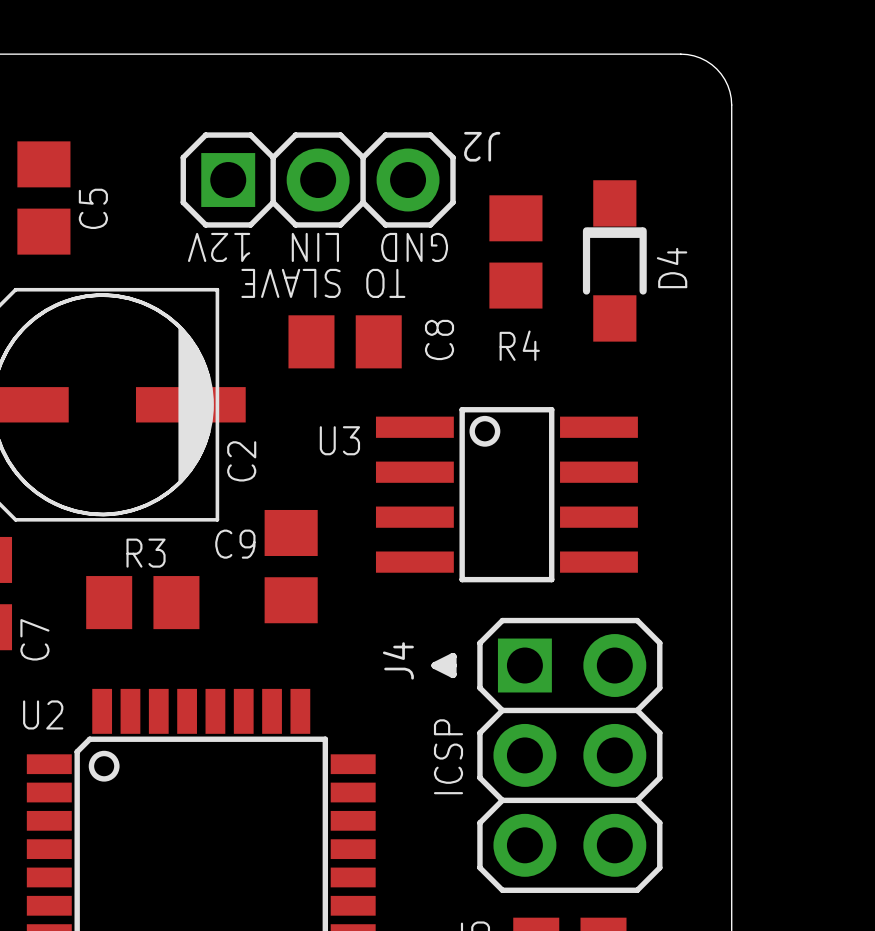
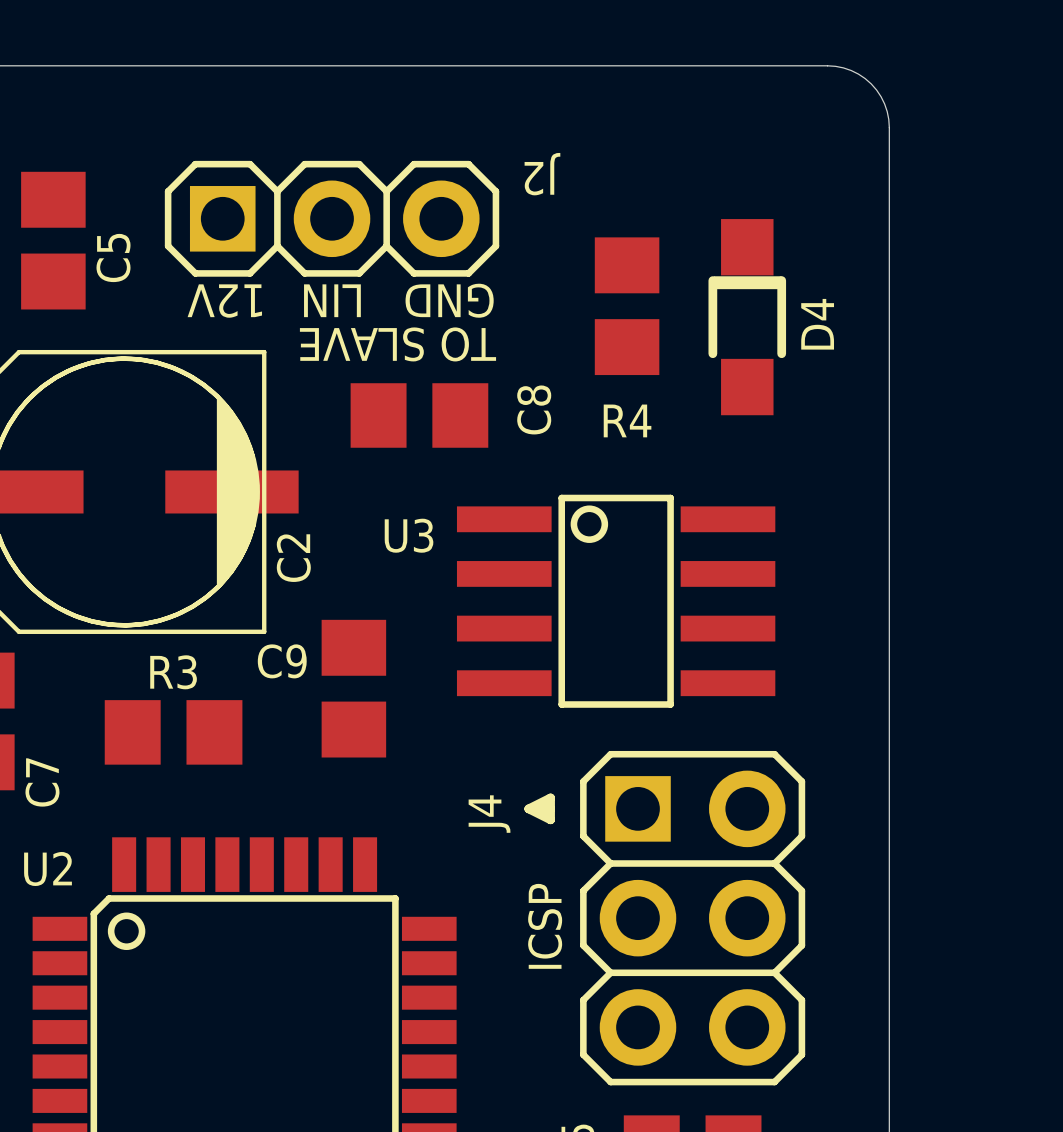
J2 position: (318, 180) -> (332, 218)
text position: 12V (219, 247) -> 12V (224, 301)
text position: LIN (315, 247) -> LIN (332, 300)
text position: GND (414, 247) -> GND (449, 300)

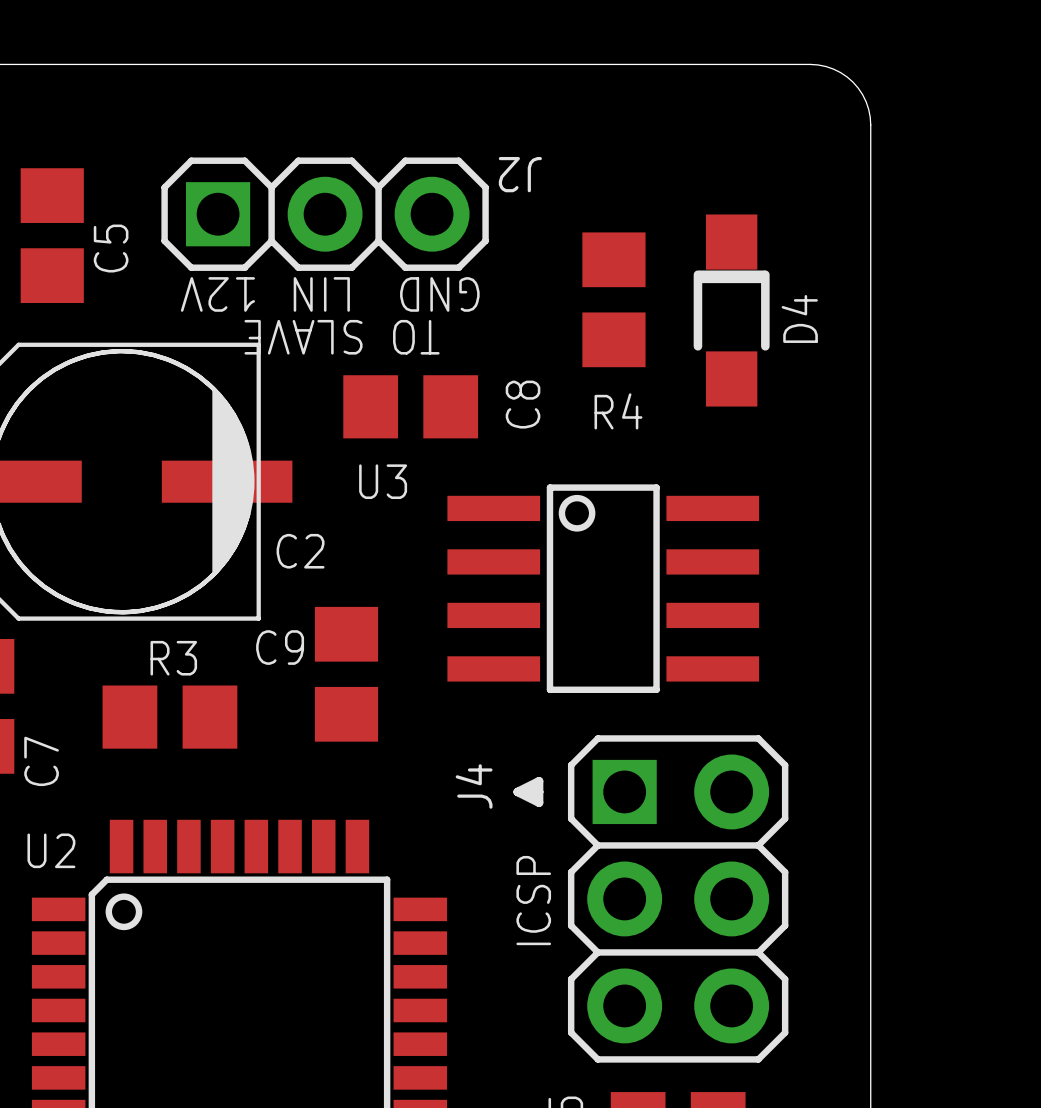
text position: TO SLAVE (397, 344) -> TO SLAVE (342, 337)
U3 name position: U3 (409, 535) -> U3 (383, 481)
C2 name rotation: 0° (293, 558) -> 90° clockwise (300, 551)

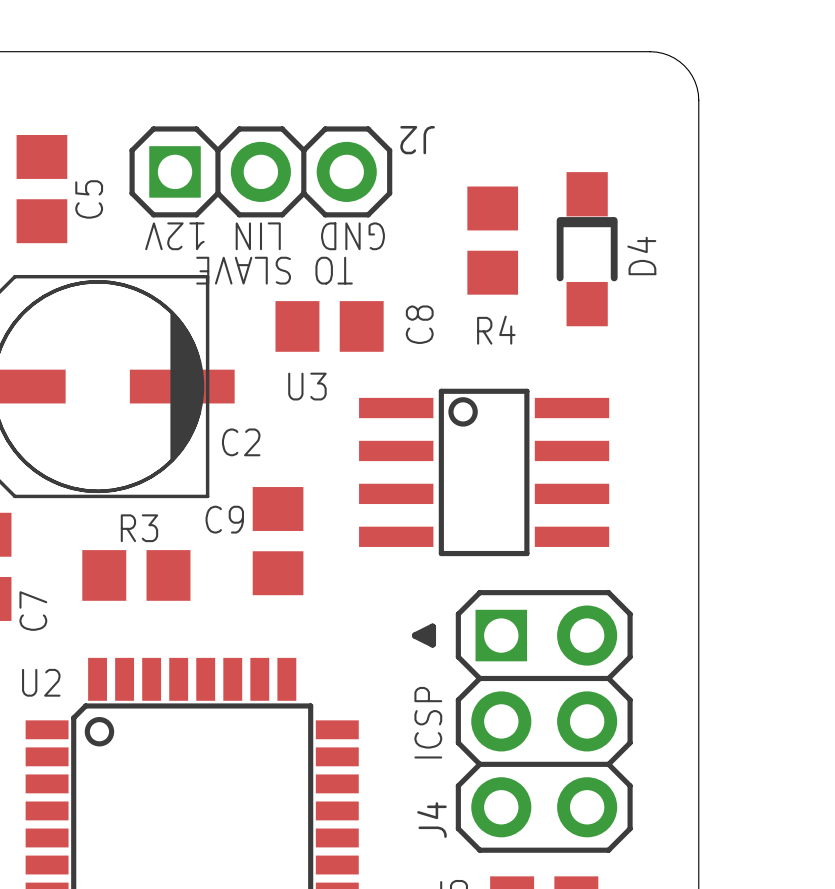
J4 name position: J4 (474, 786) -> J4 (431, 820)

